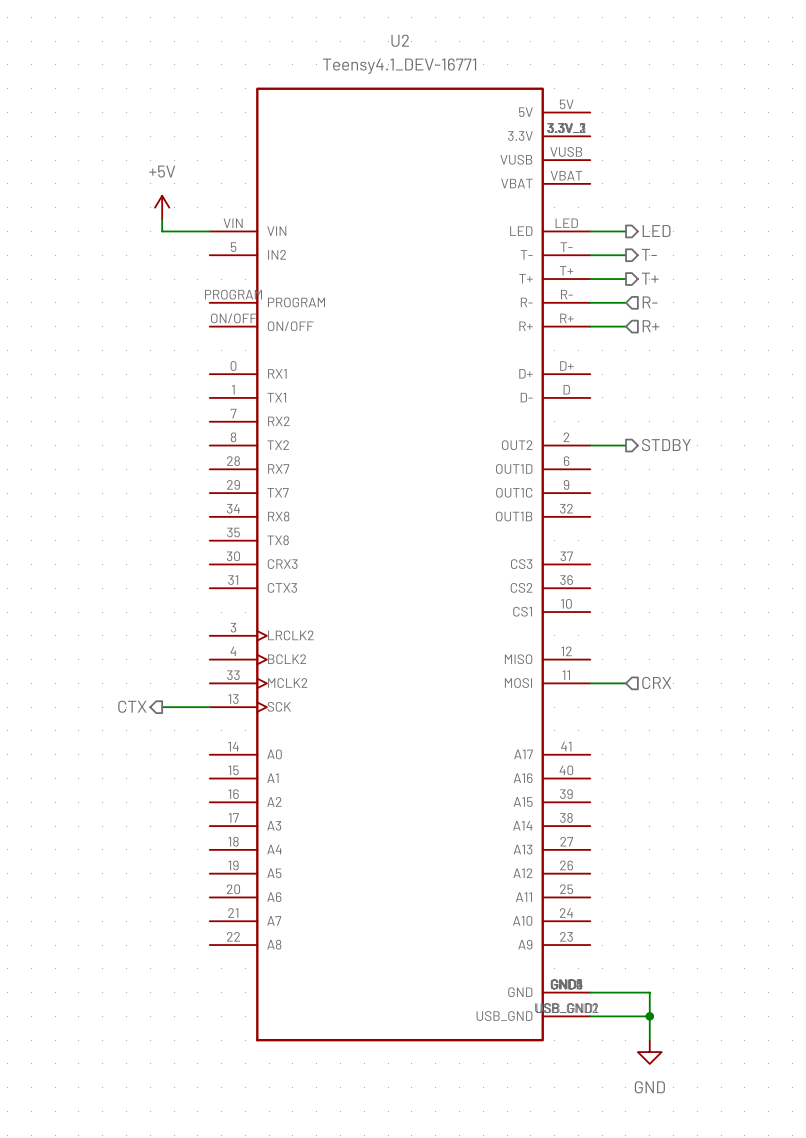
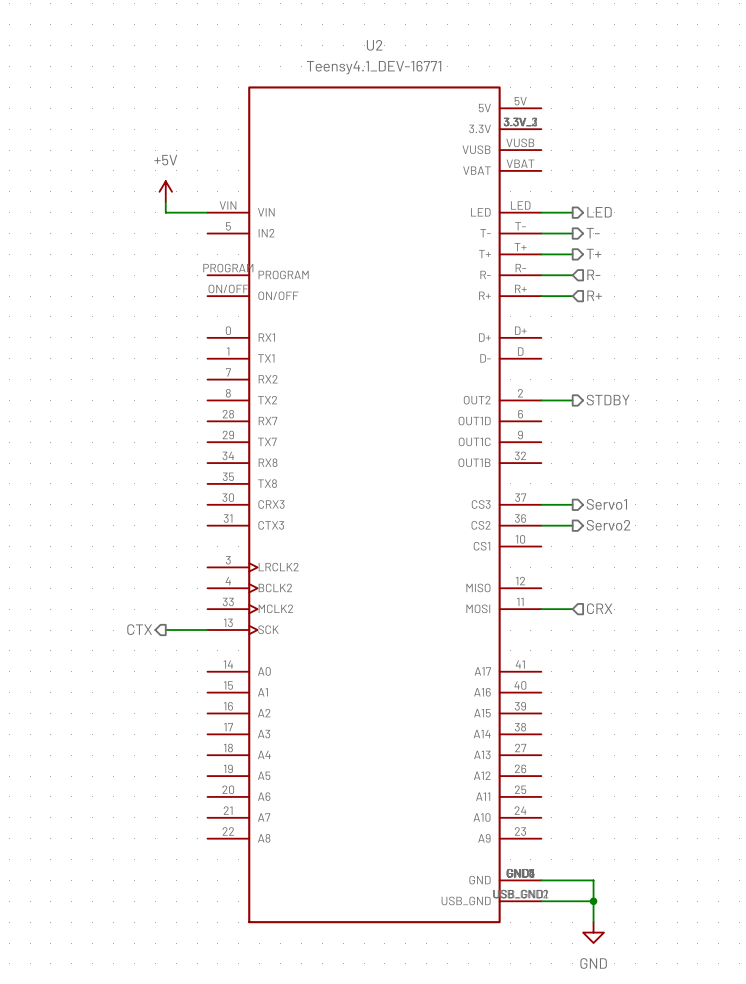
wire: none -> (541, 504) (572, 504)
hierarchical label: none -> Servo1 (606, 504)
hierarchical label: none -> Servo2 (608, 525)
wire: none -> (541, 525) (572, 525)

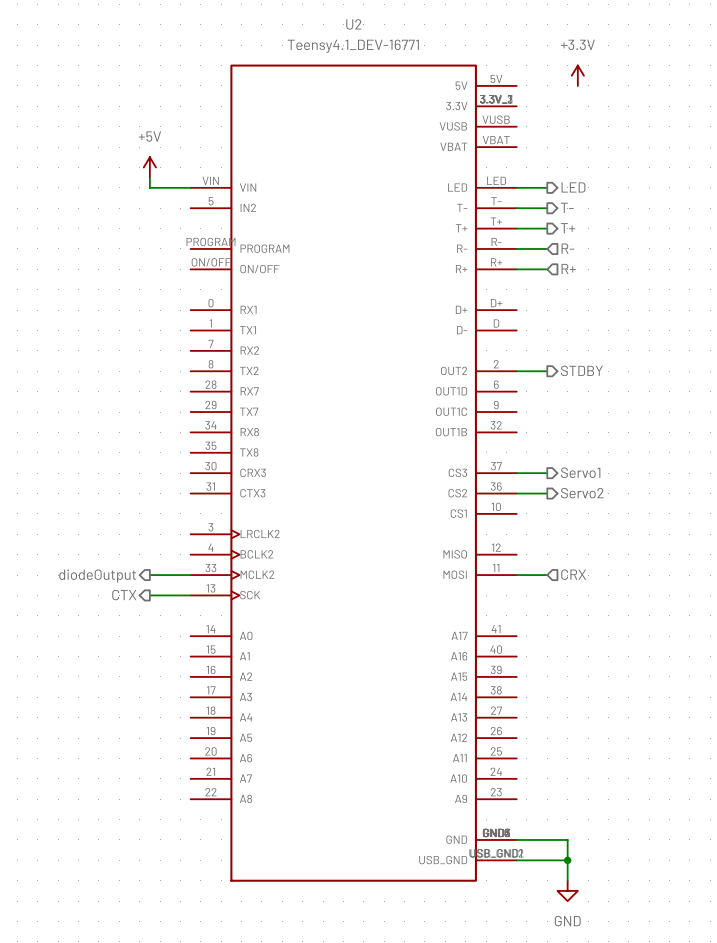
power symbol: none -> +3.3V (577, 75)
wire: none -> (149, 575) (190, 575)
hierarchical label: none -> diodeOutput (97, 576)

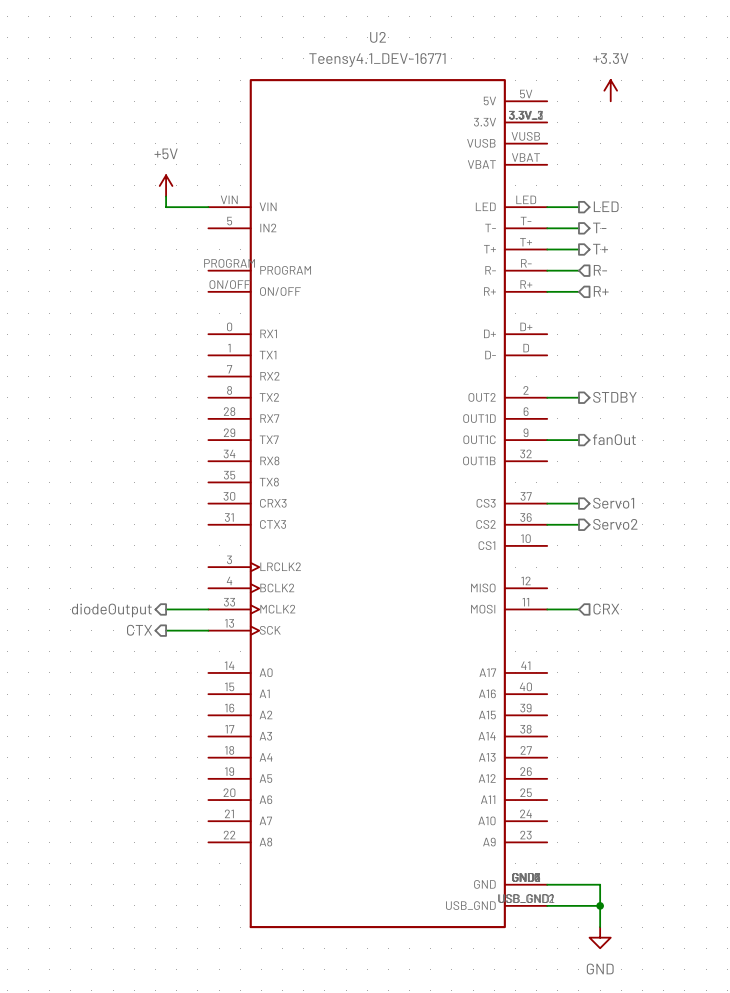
hierarchical label: none -> fanOut (614, 439)
wire: none -> (547, 440) (578, 440)

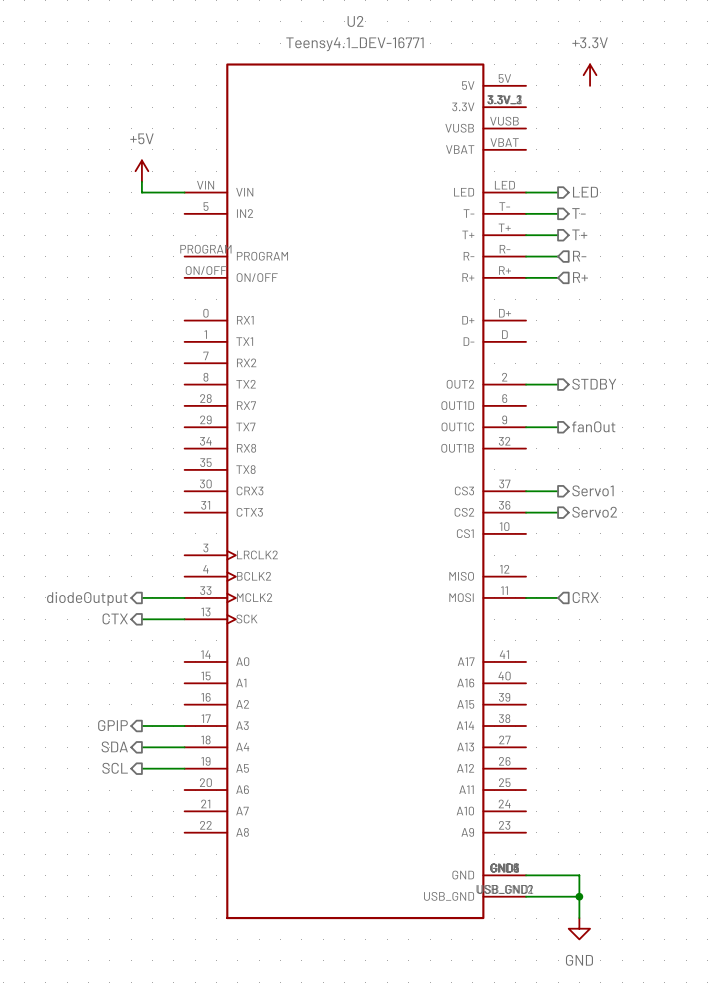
hierarchical label: none -> GPIP (112, 725)
wire: none -> (141, 726) (184, 726)
hierarchical label: none -> SDA (114, 746)
wire: none -> (141, 747) (184, 747)
hierarchical label: none -> SCL (115, 768)
wire: none -> (141, 768) (184, 768)

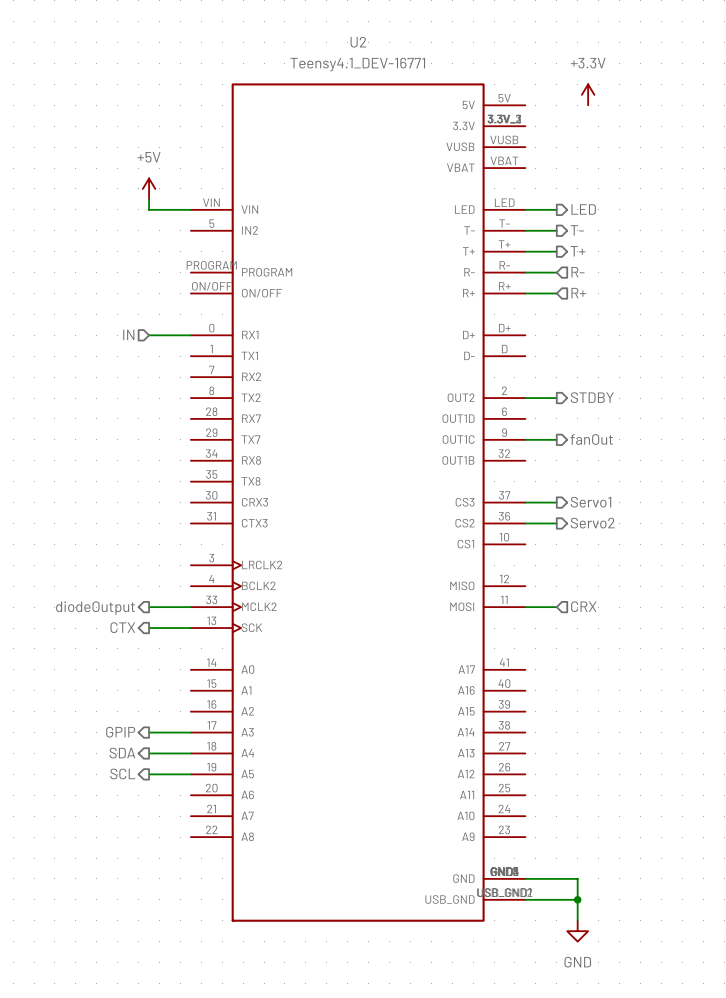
hierarchical label: none -> IN (128, 334)
wire: none -> (149, 335) (190, 335)

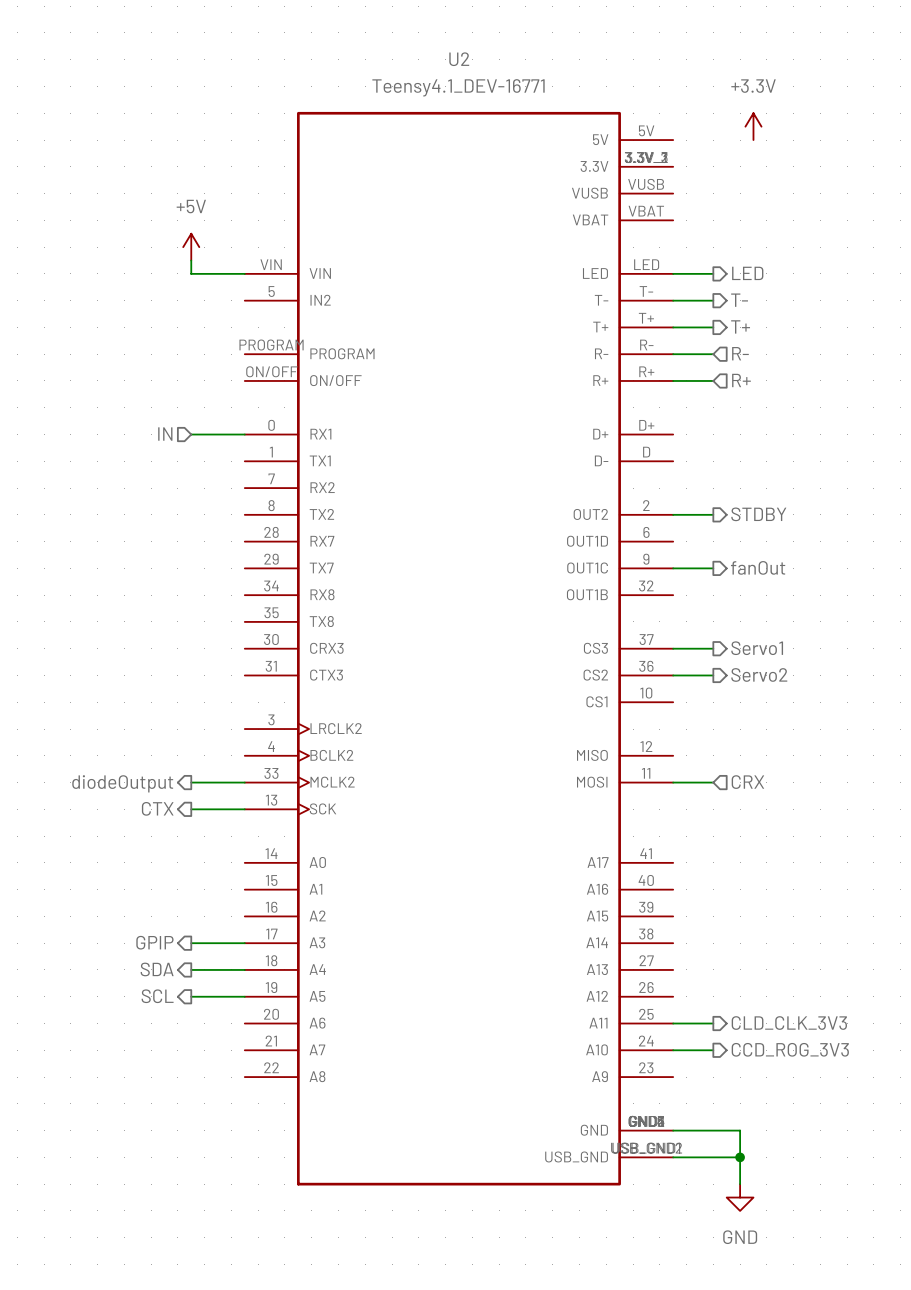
hierarchical label: none -> CLD_CLK_3V3 (789, 1023)
wire: none -> (673, 1023) (713, 1023)
hierarchical label: none -> CCD_ROG_3V3 (790, 1049)
wire: none -> (673, 1050) (713, 1050)

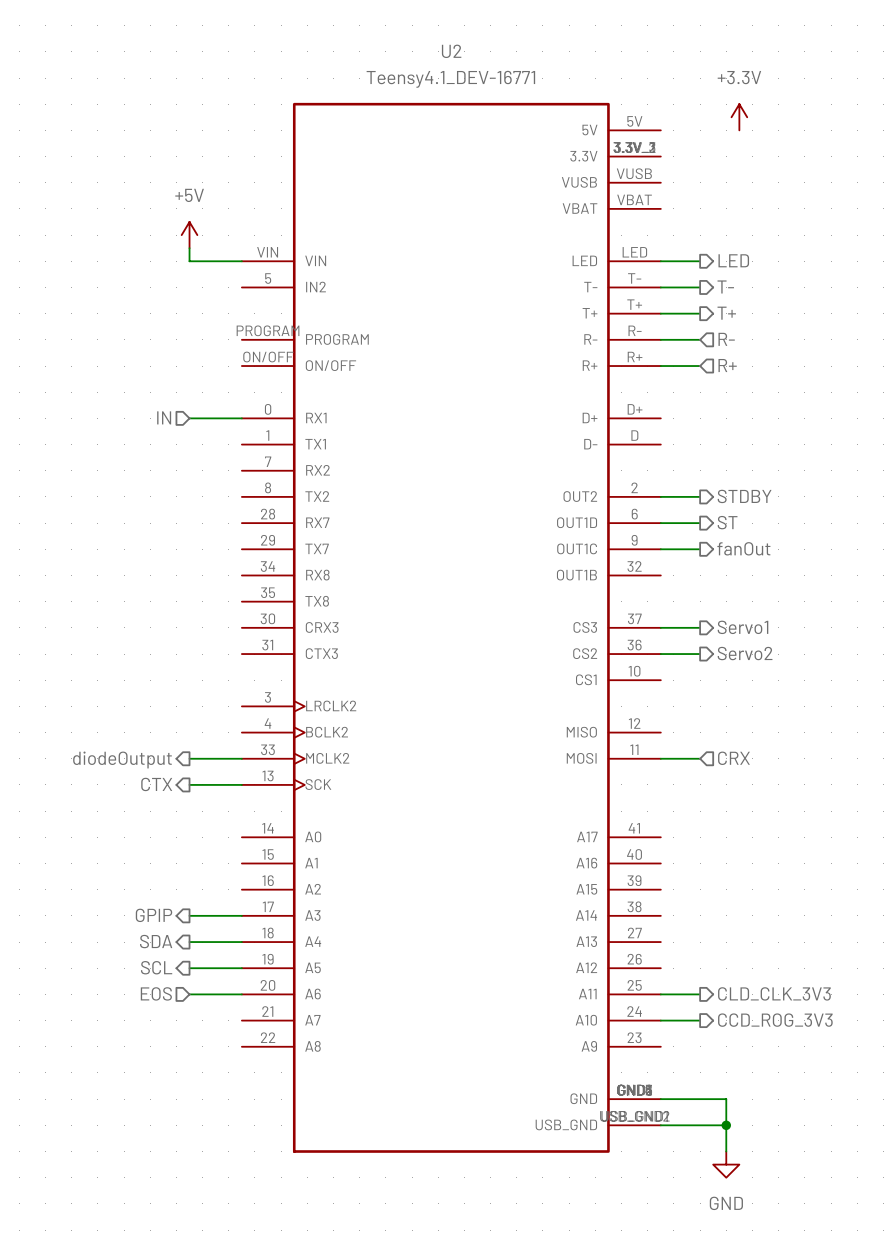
wire: none -> (660, 523) (700, 523)
hierarchical label: none -> ST (727, 522)
hierarchical label: none -> EOS (156, 993)
wire: none -> (189, 994) (241, 994)

